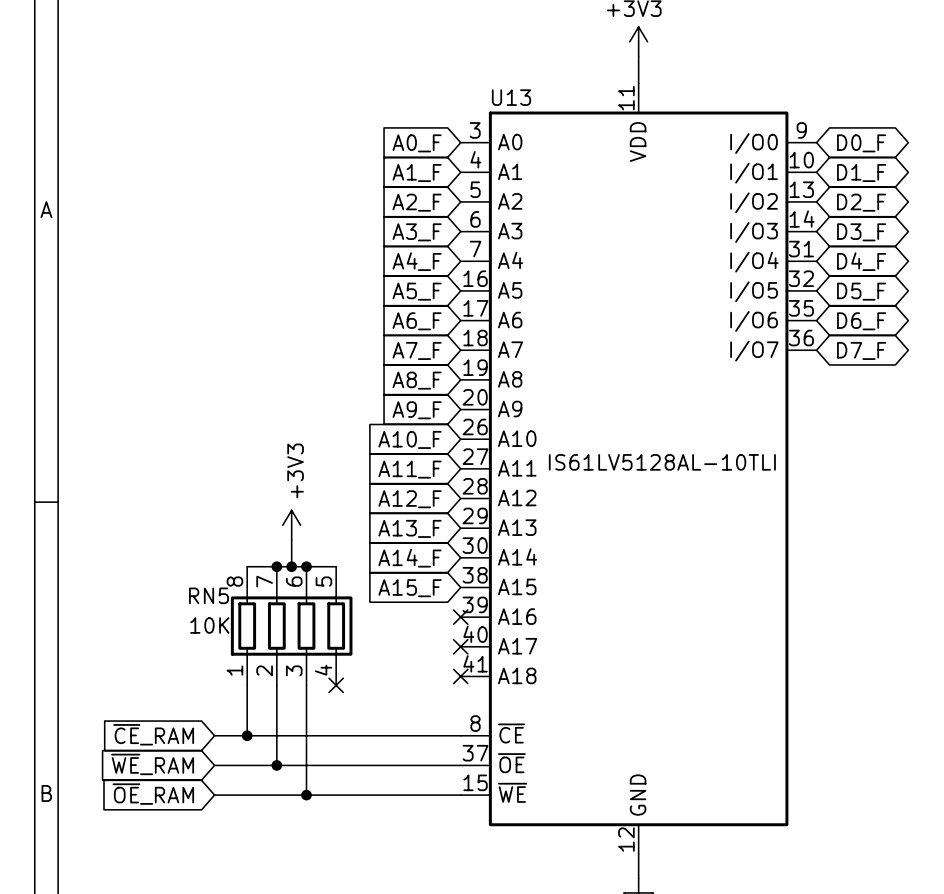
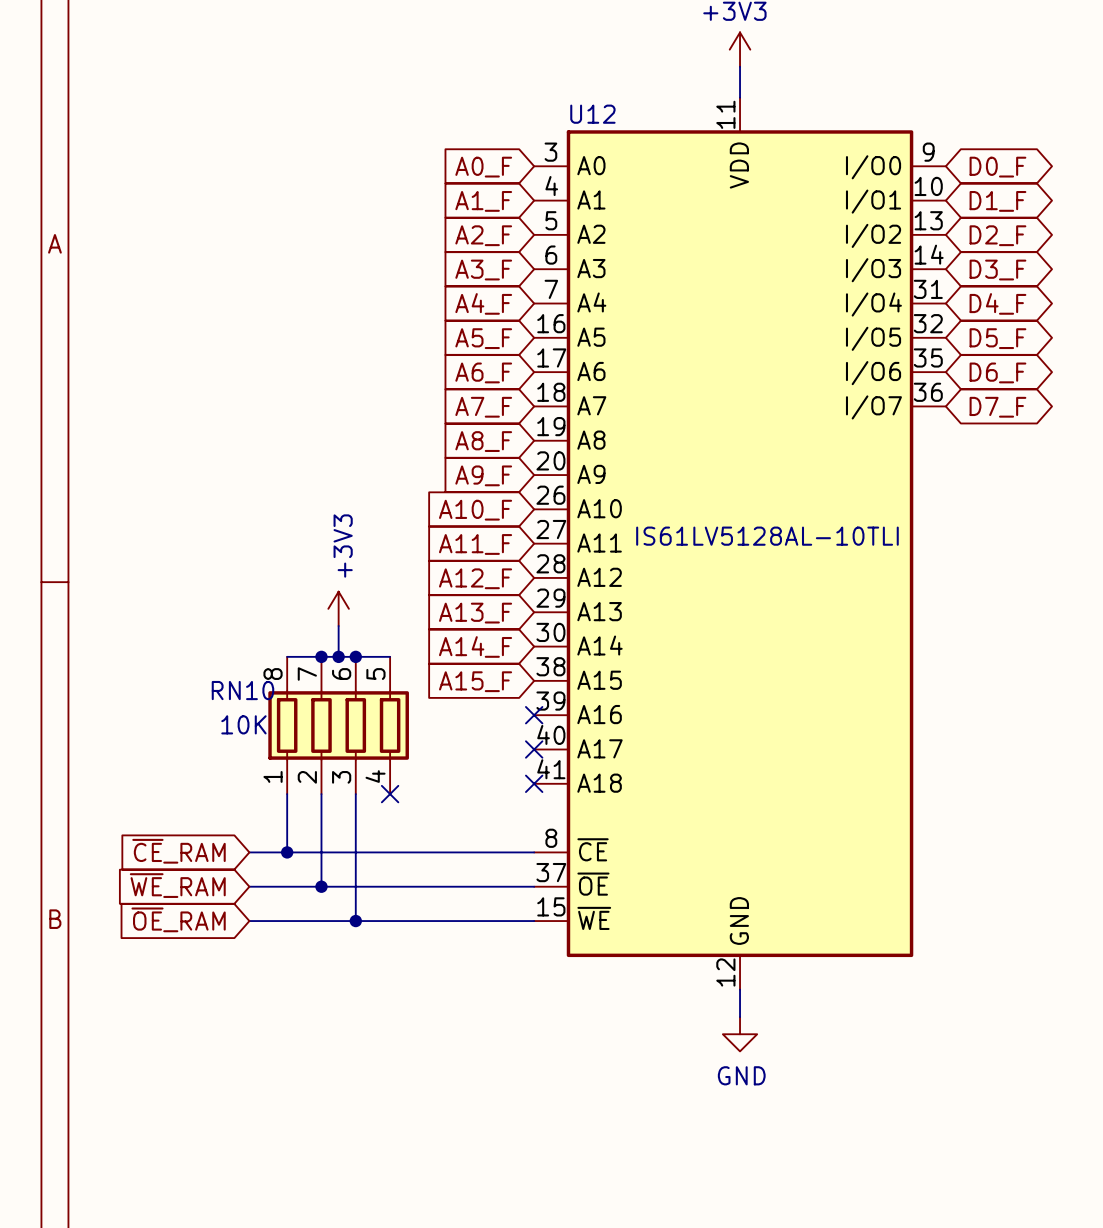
U13 name: U13 (511, 97) -> U12 (592, 114)
RN5 name: RN5 (208, 595) -> RN10 (242, 690)

